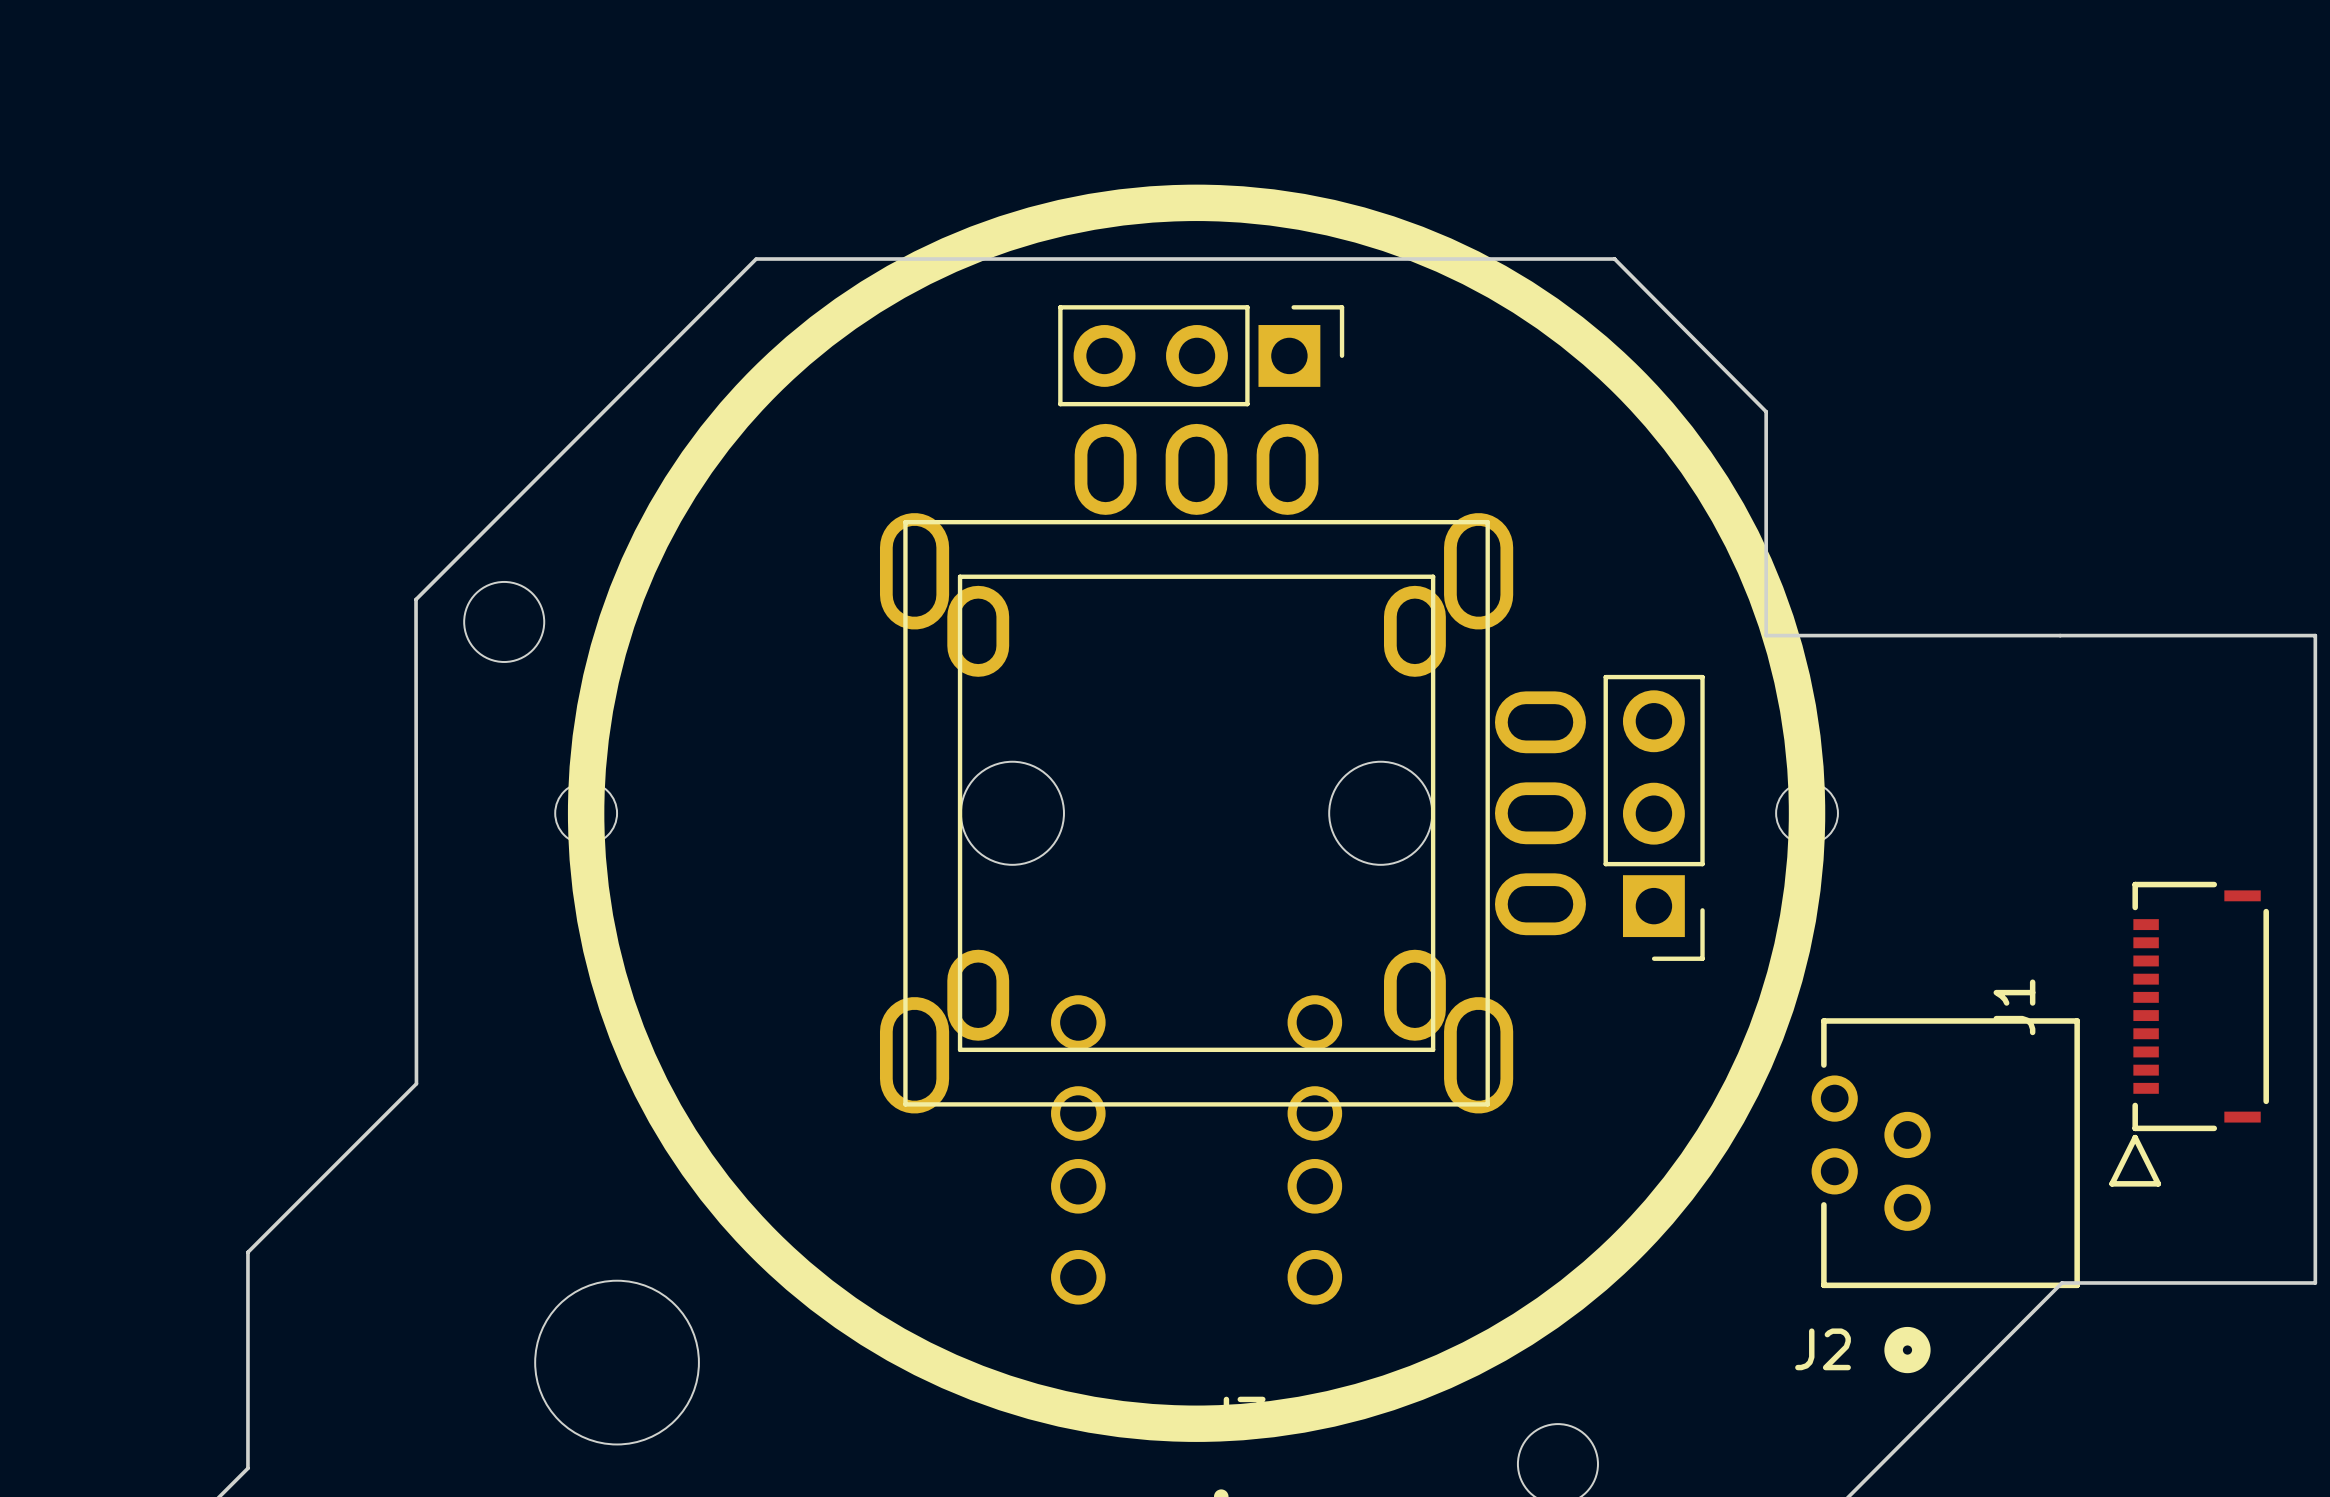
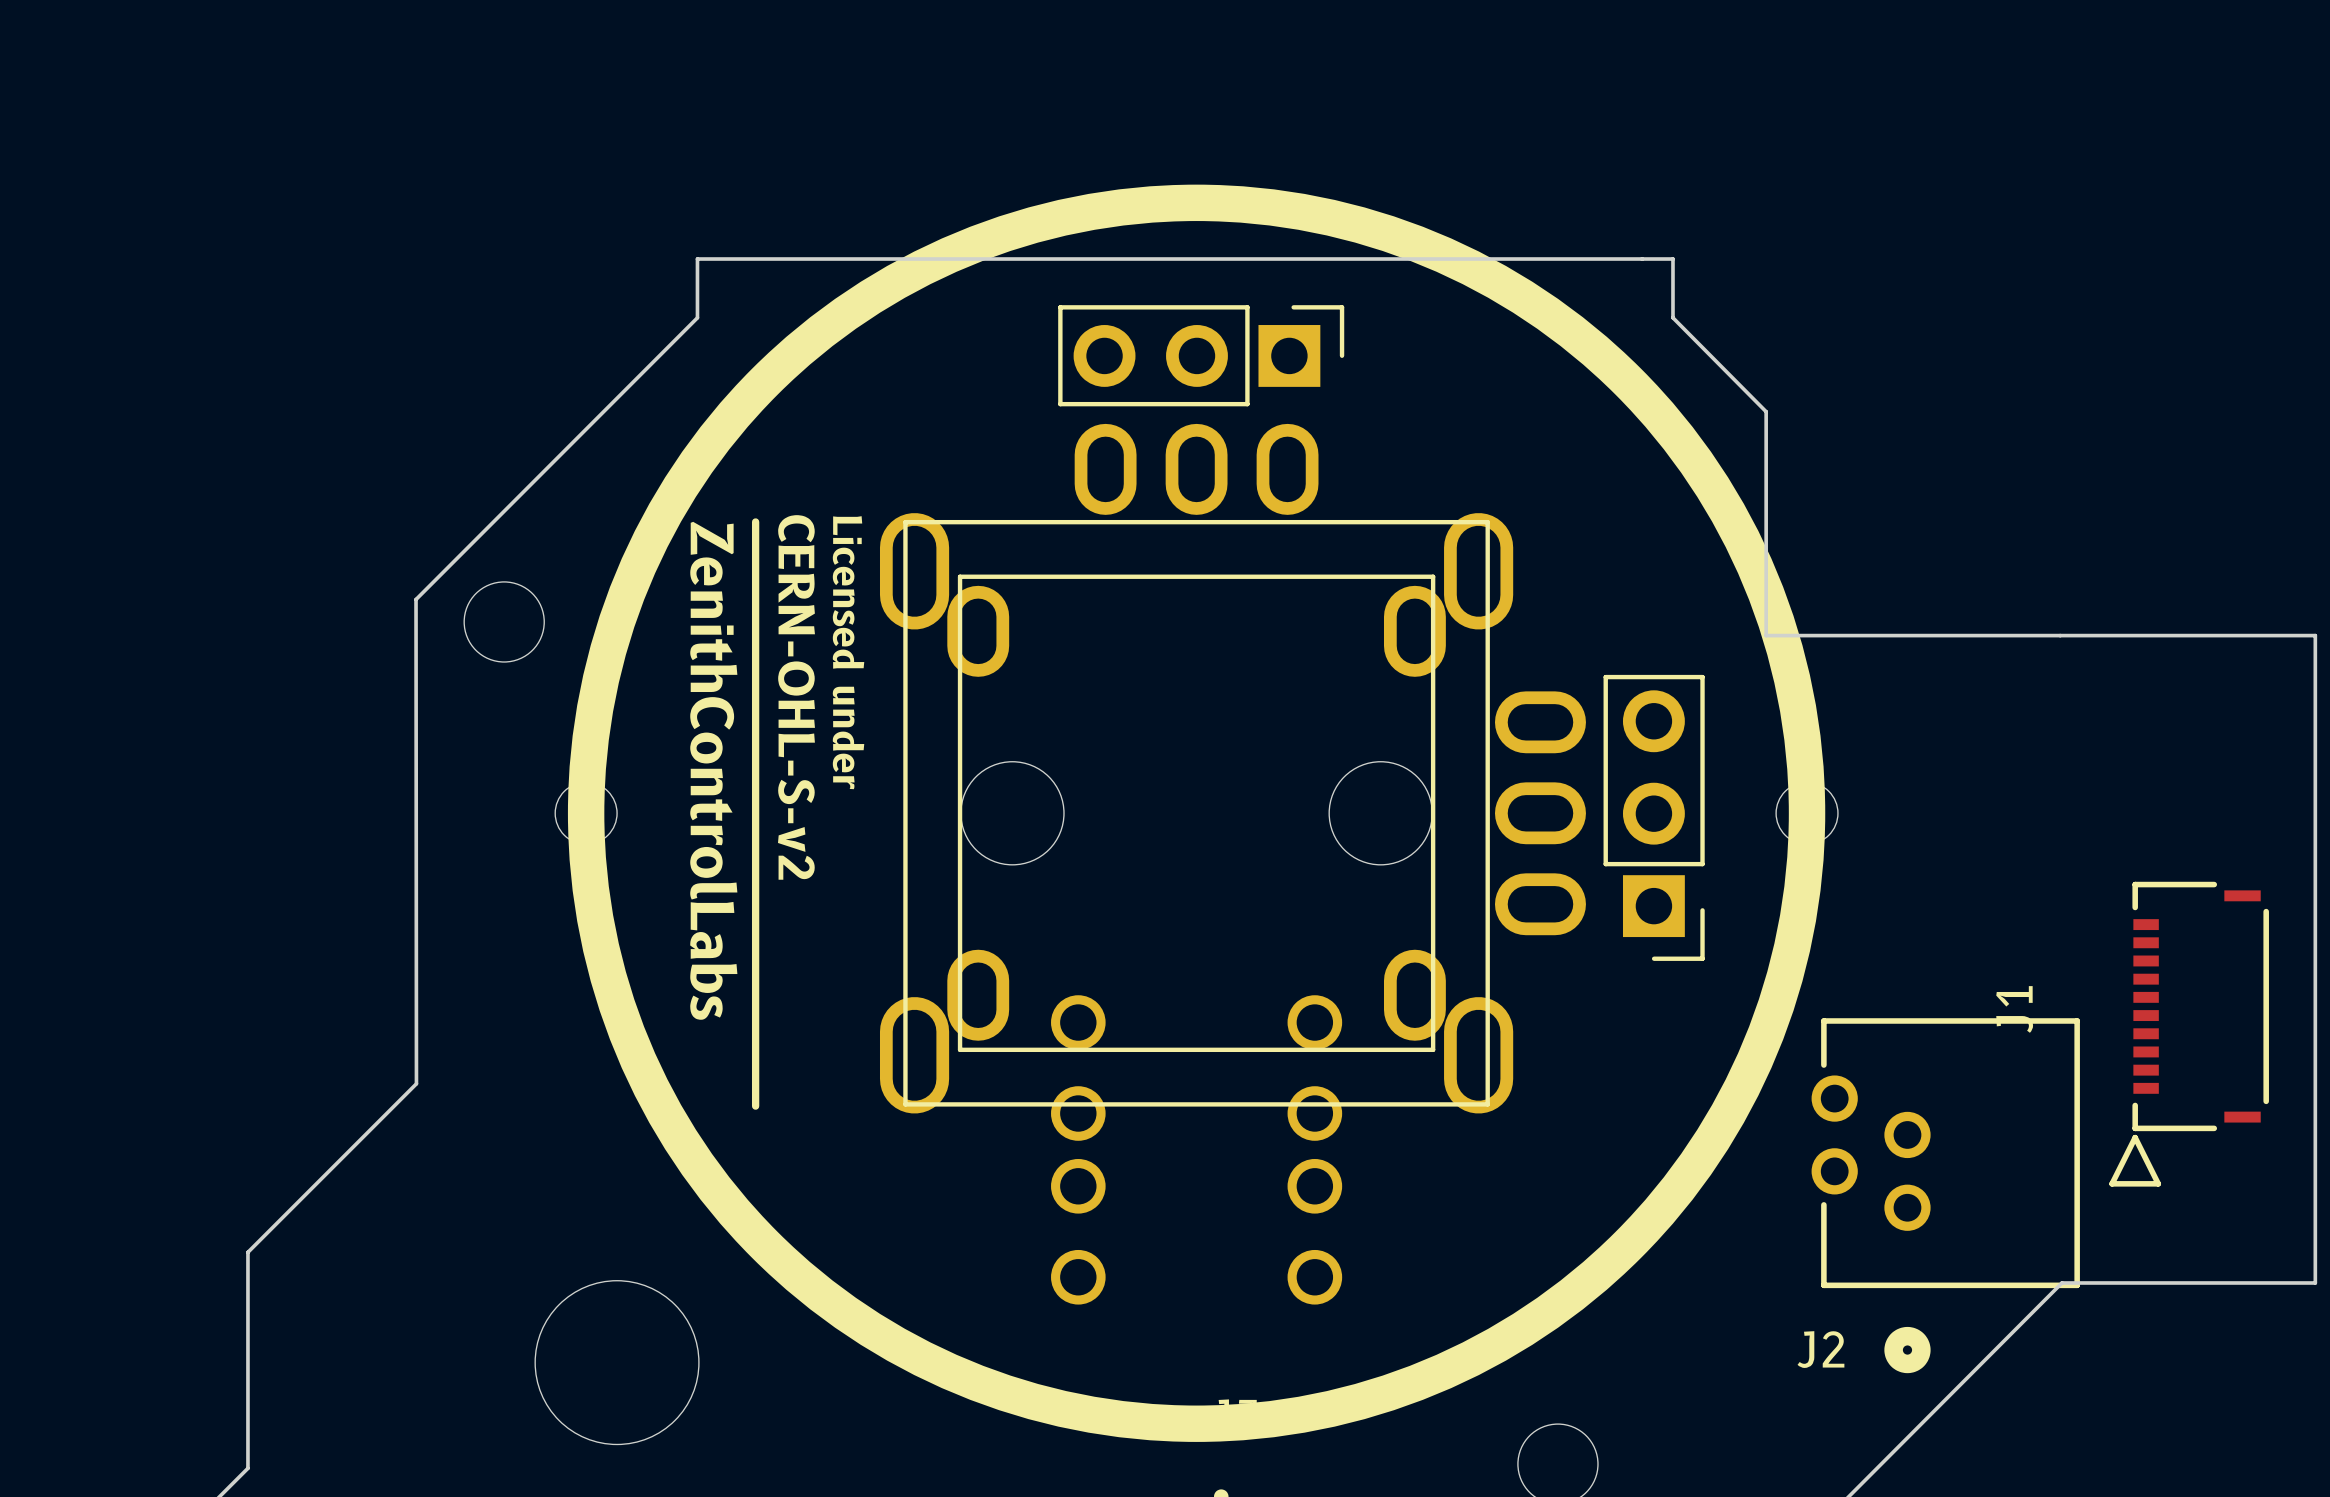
board edge: (756, 259) (697, 317) -> (756, 259) (697, 259) (697, 317)
board edge: (1614, 259) (1672, 317) -> (1614, 259) (1672, 259) (1672, 317)
line: none -> (755, 521) (755, 1106)
text: none -> Licensed under (848, 652)
text: none -> CERN-OHL-S-v2 (796, 697)
text: none -> ZenithControlLabs (713, 770)

